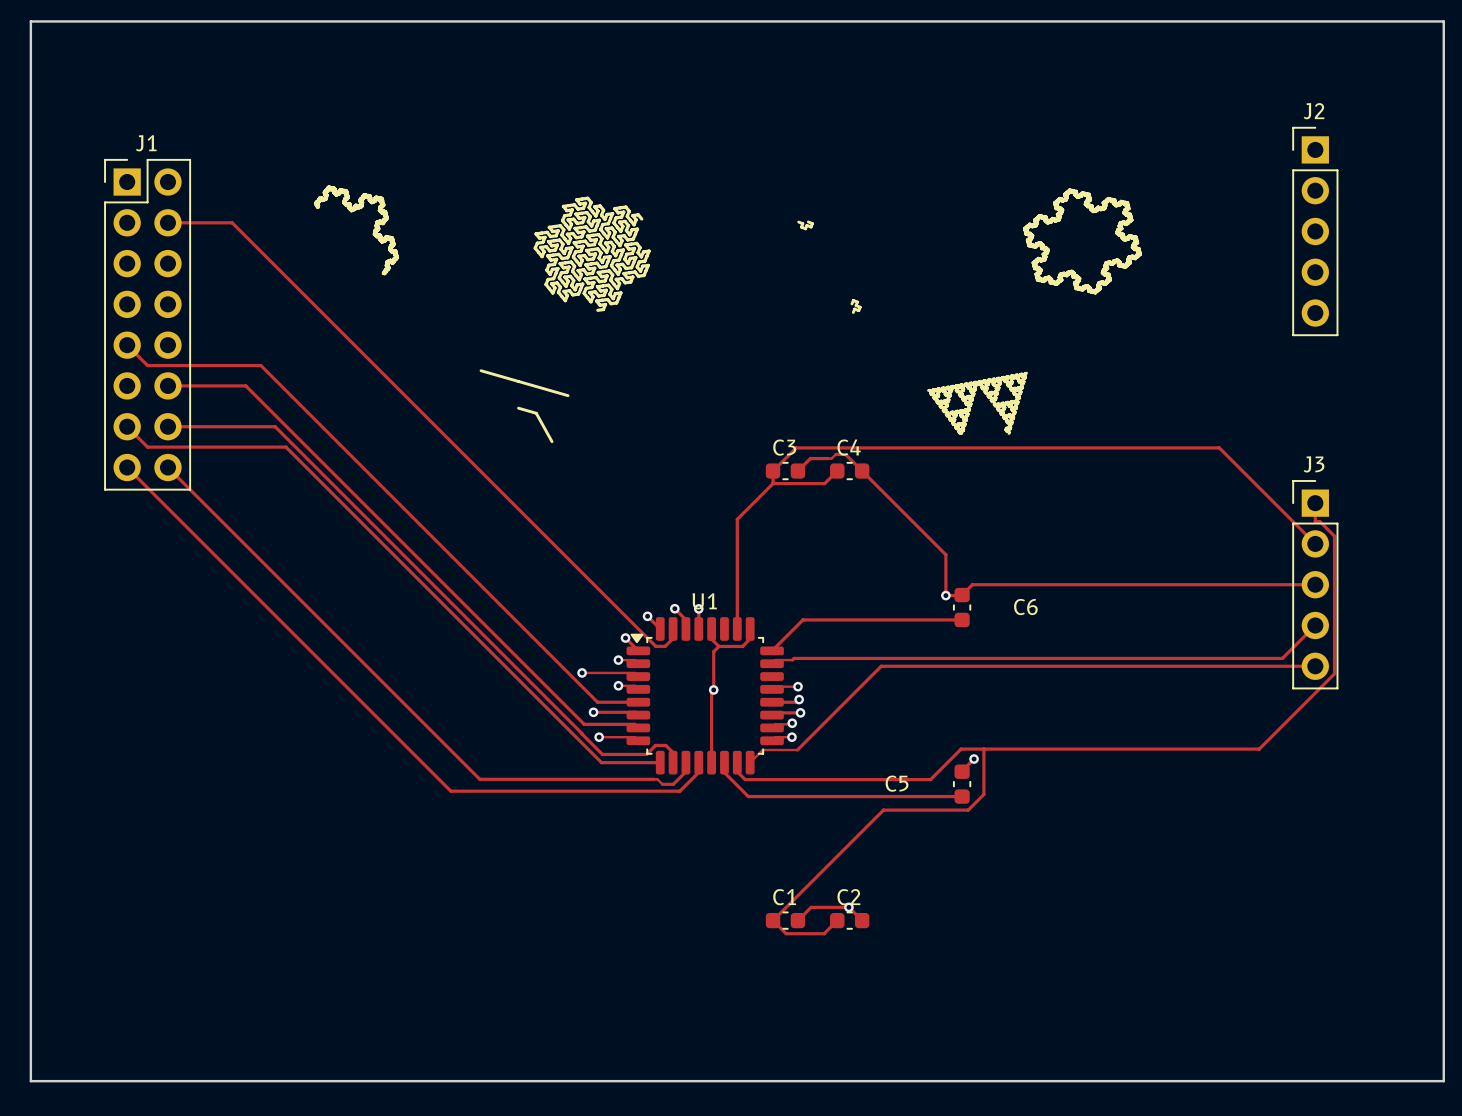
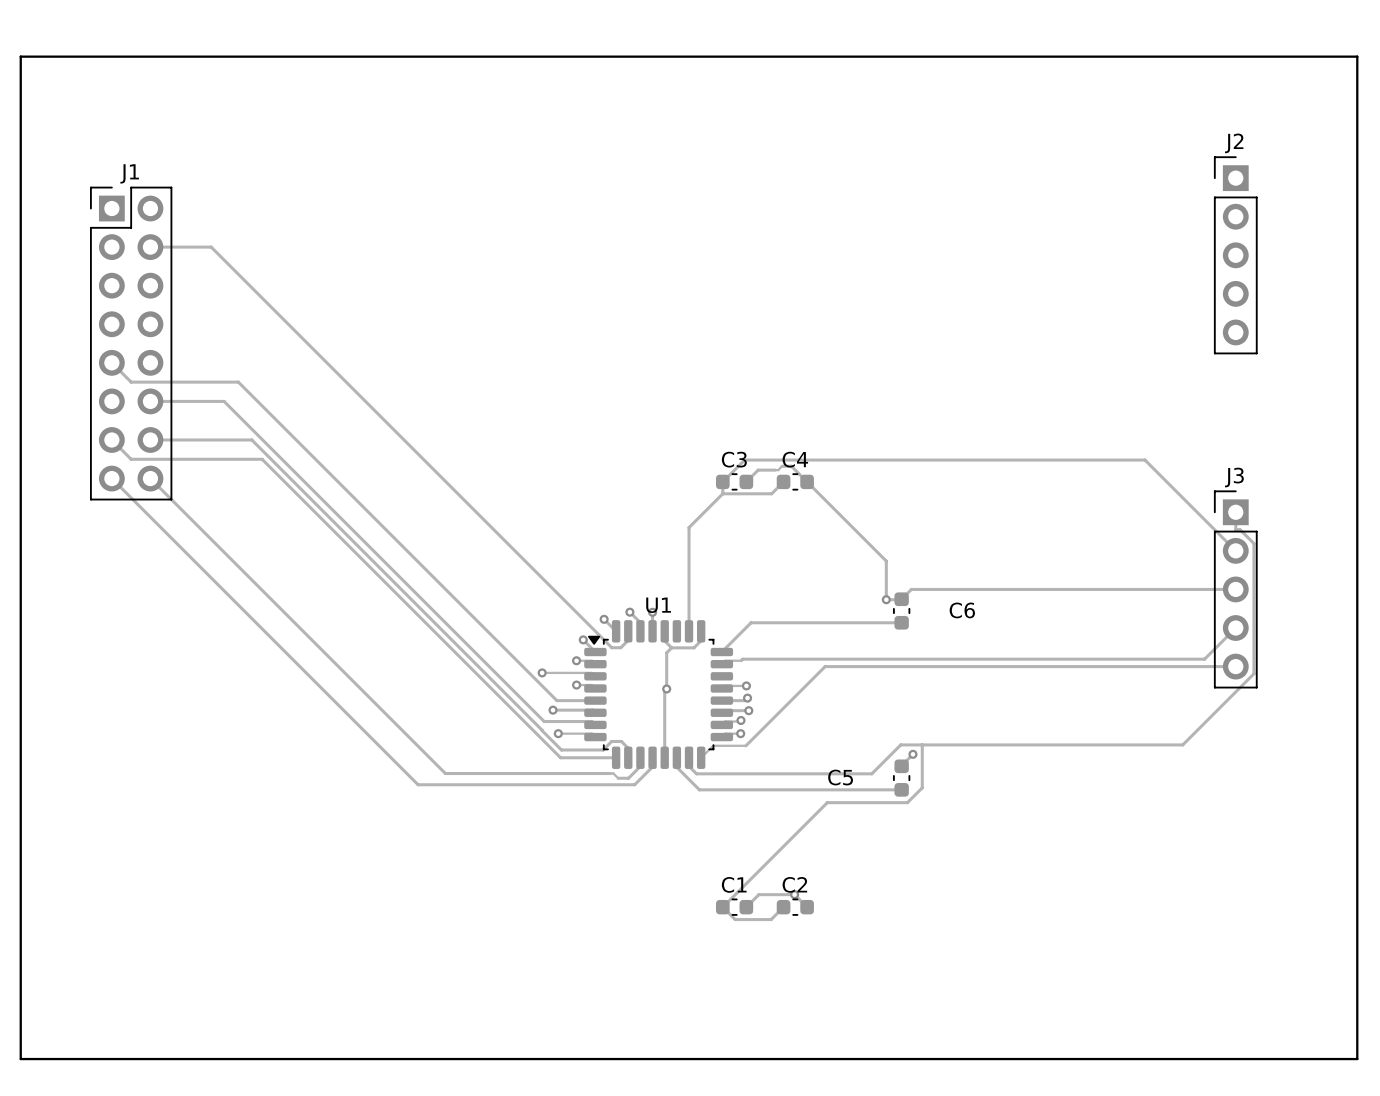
line: (1069, 190) (1068, 193) (1064, 194) (1067, 196) (1066, 200) (1062, 200) (1059, 198) (1058, 201) (1054, 202) (1057, 205) (1056, 208) (1059, 207) (1062, 210) (1061, 213) (1057, 214) (1060, 216) (1058, 220) (1055, 220) (1052, 218) (1051, 221) (1047, 222) (1044, 220) (1046, 217) (1042, 218) (1039, 215) (1038, 219) (1034, 219) (1037, 222) (1036, 225) (1032, 226) (1029, 224) (1028, 227) (1024, 228) (1027, 230) (1026, 234) (1029, 233) (1032, 235) (1031, 239) (1027, 239) (1030, 242) (1028, 245) (1032, 244) (1035, 247) (1036, 243) (1040, 242) (1043, 245) (1041, 248) (1045, 247) (1048, 249) (1047, 253) (1043, 254) (1045, 256) (1044, 259) (1040, 260) (1038, 258) (1037, 261) (1033, 262) (1035, 265) (1034, 268) (1038, 267) (1041, 269) (1039, 273) (1036, 274) (1038, 276) (1037, 278) (1037, 279) (1041, 279) (1043, 281) (1045, 278) (1048, 277) (1051, 279) (1050, 282) (1054, 281) (1056, 284) (1057, 280) (1061, 279) (1059, 277) (1060, 274) (1064, 273) (1066, 275) (1067, 272) (1071, 271) (1074, 273) (1073, 277) (1077, 276) (1079, 278) (1078, 281) (1074, 282) (1077, 285) (1076, 288) (1079, 287) (1082, 289) (1083, 286) (1087, 285) (1090, 288) (1088, 291) (1092, 290) (1095, 292) (1096, 289) (1100, 288) (1097, 286) (1098, 282) (1102, 281) (1105, 284) (1106, 280) (1110, 280) (1107, 277) (1108, 274) (1105, 275) (1102, 272) (1103, 269) (1107, 268) (1104, 266) (1106, 262) (1109, 261) (1112, 264) (1113, 260) (1117, 260) (1120, 262) (1118, 265) (1122, 264) (1125, 267) (1126, 263) (1130, 262) (1127, 260) (1128, 257) (1132, 256) (1135, 258) (1136, 255) (1140, 254) (1137, 251) (1138, 248) (1135, 249) (1132, 247) (1133, 243) (1137, 242) (1134, 240) (1136, 237) (1132, 238) (1129, 235) (1128, 239) (1124, 240) (1122, 237) (1123, 234) (1119, 235) (1116, 232) (1117, 229) (1121, 228) (1119, 226) (1120, 222) (1124, 221) (1126, 224) (1127, 220) (1131, 220) (1129, 217) (1130, 214) (1126, 215) (1123, 212) (1125, 209) (1128, 208) (1126, 206) (1127, 204) (1127, 202) (1123, 203) (1121, 201) (1119, 204) (1116, 205) (1113, 203) (1114, 200) (1110, 200) (1108, 198) (1107, 201) (1103, 202) (1105, 205) (1104, 208) (1100, 209) (1098, 207) (1097, 210) (1093, 211) (1090, 209) (1091, 205) (1088, 206) (1085, 204) (1086, 200) (1090, 200) (1087, 197) (1088, 194) (1085, 195) (1082, 192) (1081, 196) (1077, 197) (1074, 194) (1076, 191) (1072, 192) (1069, 190) -> none
line: (317, 206) (315, 203) (319, 201) (320, 197) (322, 200) (326, 199) (326, 195) (324, 192) (327, 191) (328, 187) (331, 189) (334, 188) (333, 192) (336, 195) (339, 193) (340, 189) (343, 192) (346, 190) (345, 194) (348, 197) (344, 198) (343, 202) (346, 205) (349, 204) (348, 208) (351, 210) (354, 209) (355, 205) (358, 207) (361, 206) (362, 202) (359, 200) (363, 198) (364, 194) (366, 197) (370, 196) (369, 199) (371, 202) (375, 201) (376, 197) (378, 199) (381, 198) (381, 202) (383, 205) (380, 206) (379, 210) (382, 213) (385, 211) (384, 215) (387, 218) (383, 219) (382, 223) (380, 220) (376, 222) (376, 226) (378, 228) (375, 230) (374, 234) (376, 236) (380, 235) (379, 239) (382, 241) (385, 240) (386, 236) (388, 239) (392, 237) (391, 241) (393, 244) (390, 245) (389, 249) (392, 252) (395, 251) (394, 254) (397, 257) (393, 258) (393, 262) (390, 260) (387, 261) (386, 265) (388, 268) (383, 273) -> none
line: (641, 219) (638, 214) (632, 215) (636, 219) (634, 224) (627, 216) (629, 211) (625, 207) (614, 208) (618, 212) (623, 212) (621, 217) (616, 217) (613, 222) (620, 231) (622, 226) (619, 222) (625, 221) (628, 225) (626, 230) (629, 234) (631, 229) (637, 229) (633, 239) (627, 239) (624, 235) (618, 236) (622, 240) (619, 245) (613, 237) (615, 232) (611, 227) (606, 228) (609, 232) (607, 238) (600, 229) (602, 224) (608, 223) (612, 213) (607, 214) (604, 219) (601, 215) (603, 210) (600, 205) (594, 206) (598, 210) (595, 216) (589, 207) (591, 202) (587, 198) (576, 199) (580, 204) (585, 203) (583, 208) (577, 209) (574, 204) (563, 206) (566, 210) (572, 209) (570, 214) (564, 215) (562, 220) (569, 229) (571, 224) (568, 219) (573, 219) (577, 223) (582, 222) (584, 217) (579, 218) (575, 214) (586, 212) (590, 216) (588, 221) (591, 226) (593, 221) (599, 220) (595, 230) (589, 231) (586, 226) (574, 228) (578, 232) (583, 231) (581, 236) (576, 237) (572, 233) (567, 234) (570, 238) (568, 243) (561, 235) (563, 229) (560, 225) (549, 227) (552, 231) (558, 230) (556, 235) (550, 236) (547, 232) (536, 233) (539, 238) (545, 237) (542, 242) (537, 243) (535, 248) (542, 256) (544, 251) (540, 247) (546, 246) (549, 250) (555, 250) (557, 245) (551, 245) (548, 241) (559, 240) (563, 244) (560, 249) (564, 253) (566, 248) (572, 247) (567, 257) (562, 258) (558, 254) (547, 255) (551, 260) (556, 259) (554, 264) (548, 265) (546, 270) (550, 274) (552, 269) (557, 268) (553, 278) (548, 279) (545, 284) (552, 292) (554, 287) (551, 283) (557, 282) (560, 287) (558, 292) (565, 300) (567, 295) (563, 291) (569, 290) (572, 294) (578, 294) (582, 284) (577, 284) (575, 289) (571, 285) (573, 280) (570, 276) (564, 277) (568, 281) (566, 286) (559, 277) (561, 272) (566, 272) (569, 267) (563, 267) (560, 263) (571, 262) (574, 266) (572, 271) (579, 279) (581, 274) (578, 270) (583, 269) (587, 274) (592, 273) (594, 268) (589, 268) (585, 264) (596, 263) (600, 267) (605, 266) (610, 256) (604, 257) (602, 262) (599, 258) (601, 253) (597, 248) (586, 250) (590, 254) (595, 253) (593, 258) (587, 259) (584, 255) (578, 256) (582, 260) (580, 265) (573, 257) (575, 251) (581, 251) (583, 246) (577, 246) (574, 242) (585, 241) (588, 245) (594, 244) (596, 239) (590, 240) (587, 236) (598, 234) (601, 238) (599, 243) (606, 252) (608, 247) (605, 243) (610, 242) (614, 246) (612, 251) (615, 255) (617, 250) (623, 249) (619, 260) (613, 260) (611, 265) (618, 274) (620, 269) (617, 265) (622, 264) (626, 268) (631, 267) (635, 257) (630, 258) (628, 263) (624, 259) (626, 254) (632, 253) (634, 248) (628, 249) (625, 244) (636, 243) (640, 247) (637, 252) (641, 256) (643, 251) (649, 251) (644, 261) (639, 261) (637, 266) (640, 271) (642, 266) (648, 265) (644, 275) (638, 276) (635, 271) (623, 273) (627, 277) (632, 277) (630, 282) (625, 282) (621, 278) (616, 279) (619, 283) (617, 288) (610, 280) (612, 275) (609, 270) (598, 272) (601, 276) (607, 275) (605, 280) (599, 281) (596, 277) (584, 279) (588, 283) (593, 282) (591, 287) (586, 288) (584, 293) (590, 301) (593, 296) (589, 292) (595, 291) (598, 296) (604, 295) (606, 290) (600, 290) (597, 286) (608, 285) (611, 289) (609, 294) (613, 298) (615, 293) (620, 292) (616, 302) (611, 303) (607, 299) (596, 301) (599, 305) (605, 304) (603, 309) (597, 310) -> none
line: (798, 222) (802, 223) (801, 227) (805, 228) (806, 225) (811, 227) (812, 223) (808, 221) -> none
line: (851, 303) (853, 300) (857, 302) (856, 305) (860, 307) (858, 310) (854, 309) (853, 312) -> none
line: (481, 370) (568, 395) -> none
line: (1026, 373) (1025, 378) (1021, 374) (1018, 376) (1015, 375) (1019, 382) (1021, 380) (1024, 381) (1022, 388) (1018, 387) (1017, 389) (1021, 391) (1019, 398) (1013, 393) (1014, 388) (1011, 390) (1007, 384) (1009, 382) (1011, 383) (1012, 375) (1009, 377) (1006, 376) (1006, 381) (1003, 377) (1000, 379) (997, 378) (1000, 382) (998, 389) (992, 383) (994, 378) (990, 381) (988, 379) (988, 384) (985, 380) (981, 382) (979, 381) (982, 388) (984, 387) (987, 388) (984, 391) (988, 397) (990, 392) (997, 392) (995, 399) (991, 398) (991, 400) (995, 406) (998, 403) (997, 408) (1001, 414) (1004, 407) (1001, 403) (1005, 404) (1007, 402) (1009, 406) (1011, 401) (1018, 401) (1016, 408) (1012, 407) (1011, 409) (1015, 412) (1013, 418) (1010, 414) (1003, 417) (1007, 423) (1009, 421) (1012, 422) (1010, 429) (1006, 428) (1009, 433) -> none
line: (928, 390) (933, 394) (933, 389) (935, 390) (939, 388) (938, 396) (935, 395) (933, 397) (937, 403) (941, 401) (939, 406) (945, 411) (947, 404) (944, 402) (944, 400) (948, 401) (950, 394) (949, 393) (945, 395) (942, 388) (944, 389) (948, 387) (951, 391) (951, 386) (954, 387) (957, 385) (956, 390) (961, 395) (963, 389) (960, 384) (963, 386) (966, 383) (969, 388) (969, 383) (972, 384) (976, 382) (975, 390) (972, 389) (970, 391) (974, 393) (972, 400) (969, 396) (962, 398) (966, 404) (968, 402) (971, 403) (969, 410) (965, 409) (968, 414) (966, 420) (960, 415) (962, 410) (959, 412) (955, 411) (955, 416) (952, 411) (946, 414) (950, 420) (953, 418) (952, 423) (956, 428) (958, 423) (962, 424) (964, 422) (963, 430) (959, 430) (958, 431) (961, 433) -> none
line: (518, 408) (536, 413) (552, 441) -> none

